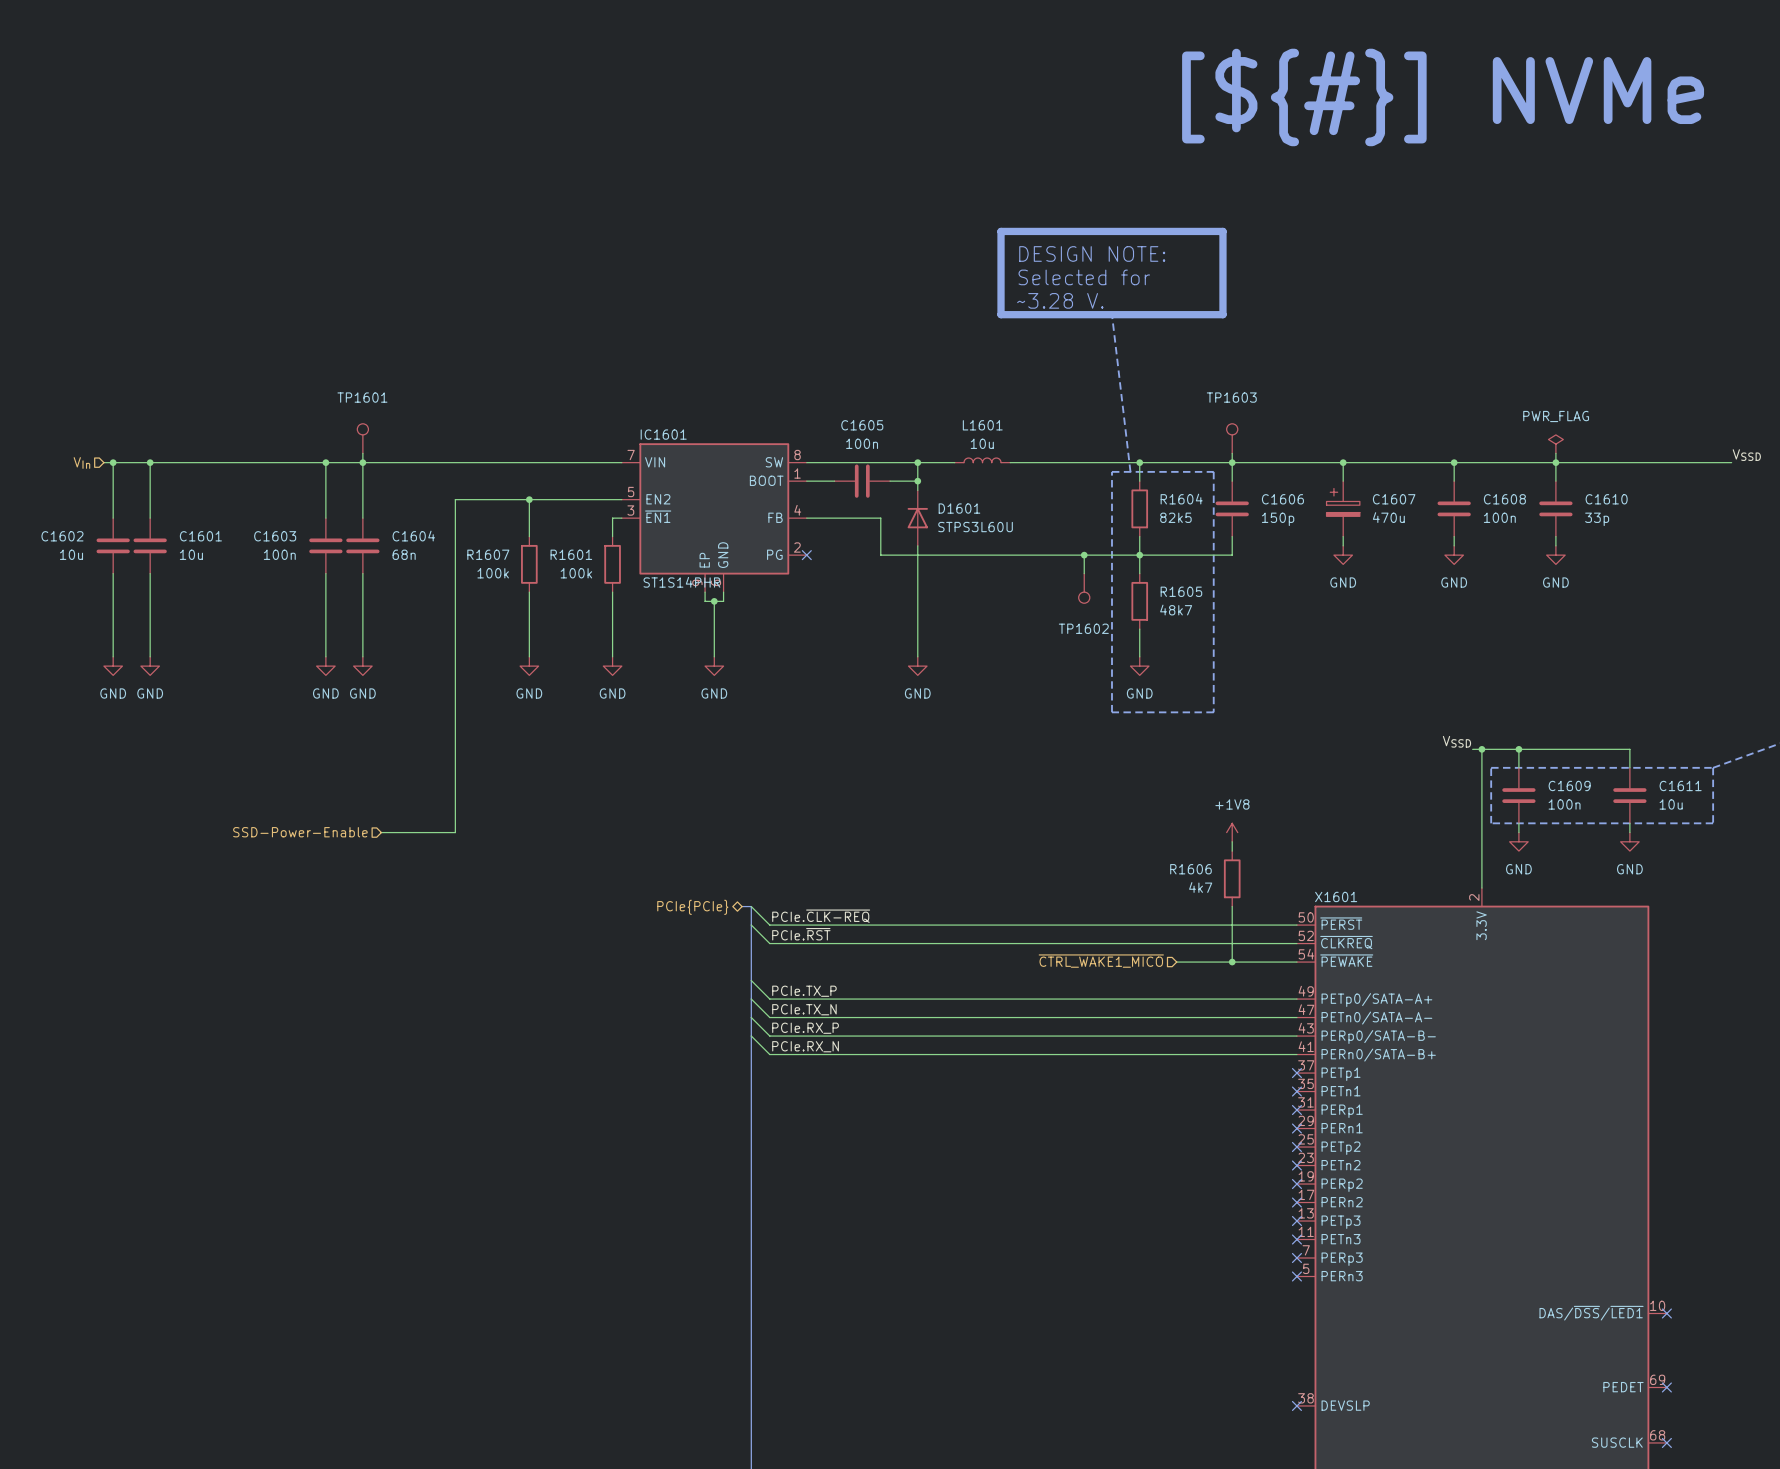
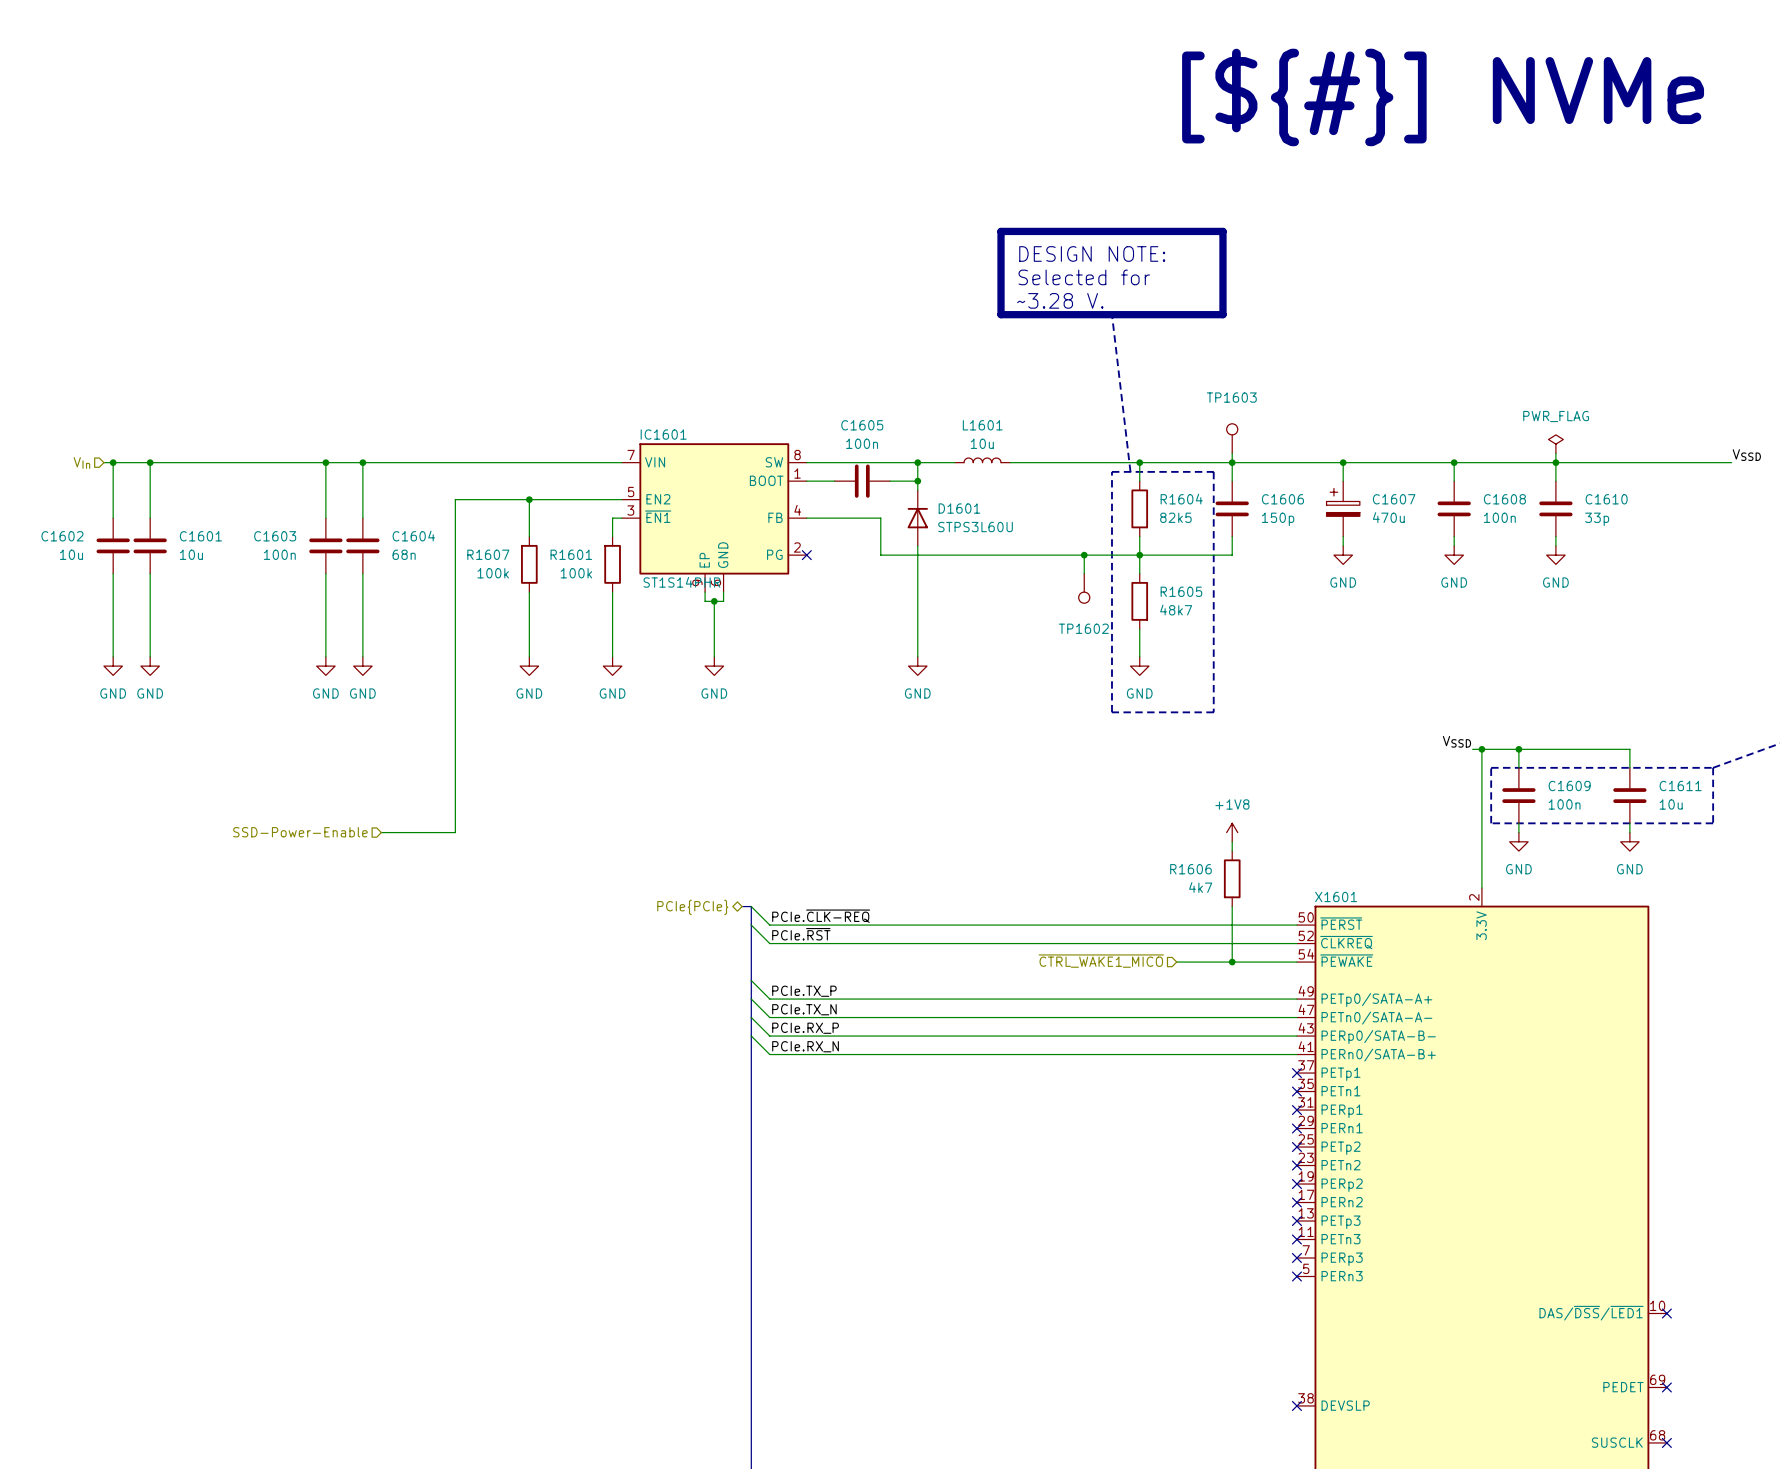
TP1601: (362, 438) -> none
wire: (362, 453) (362, 462) -> none

